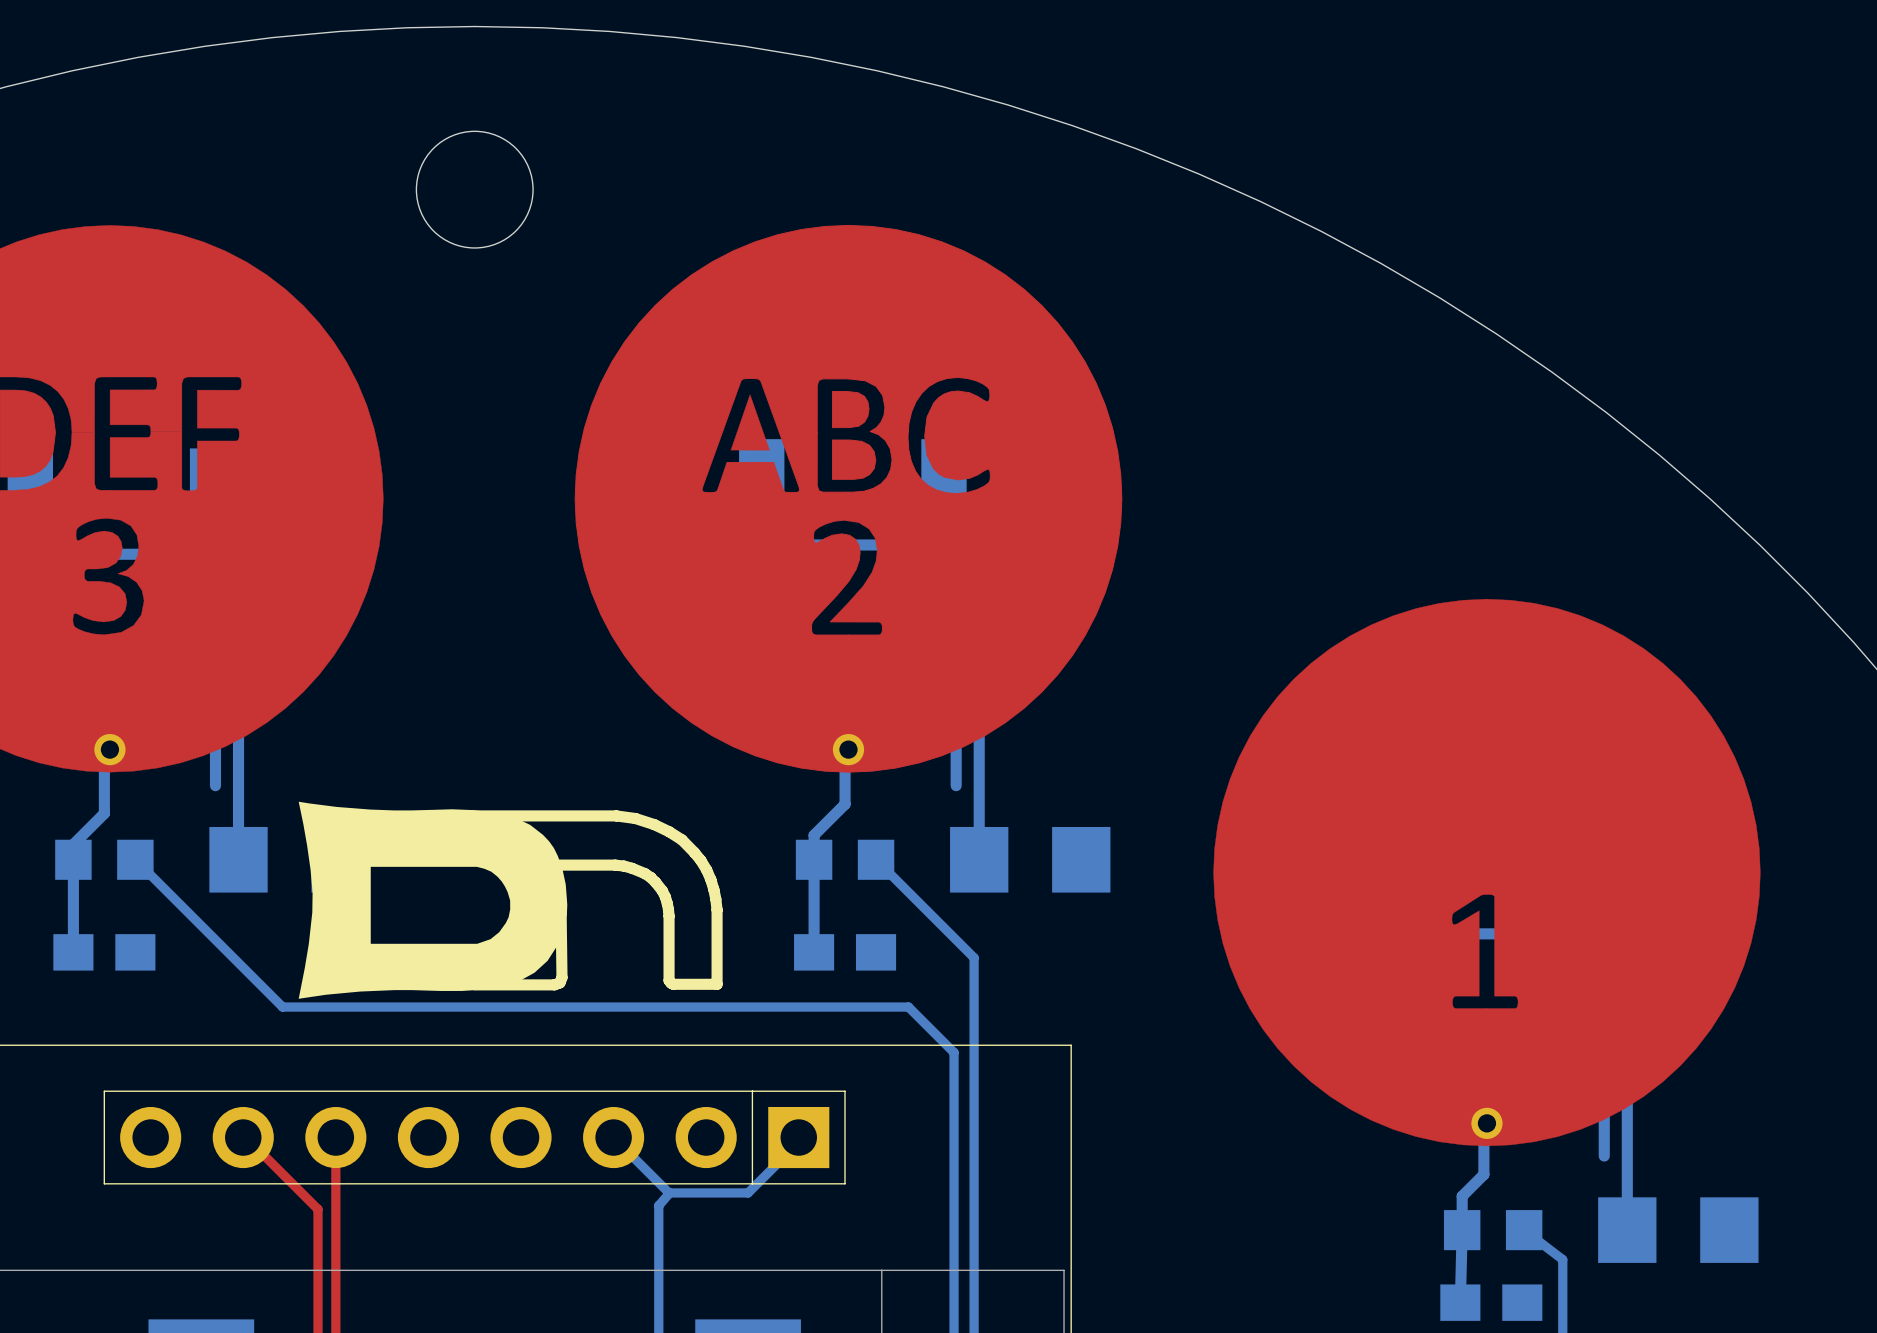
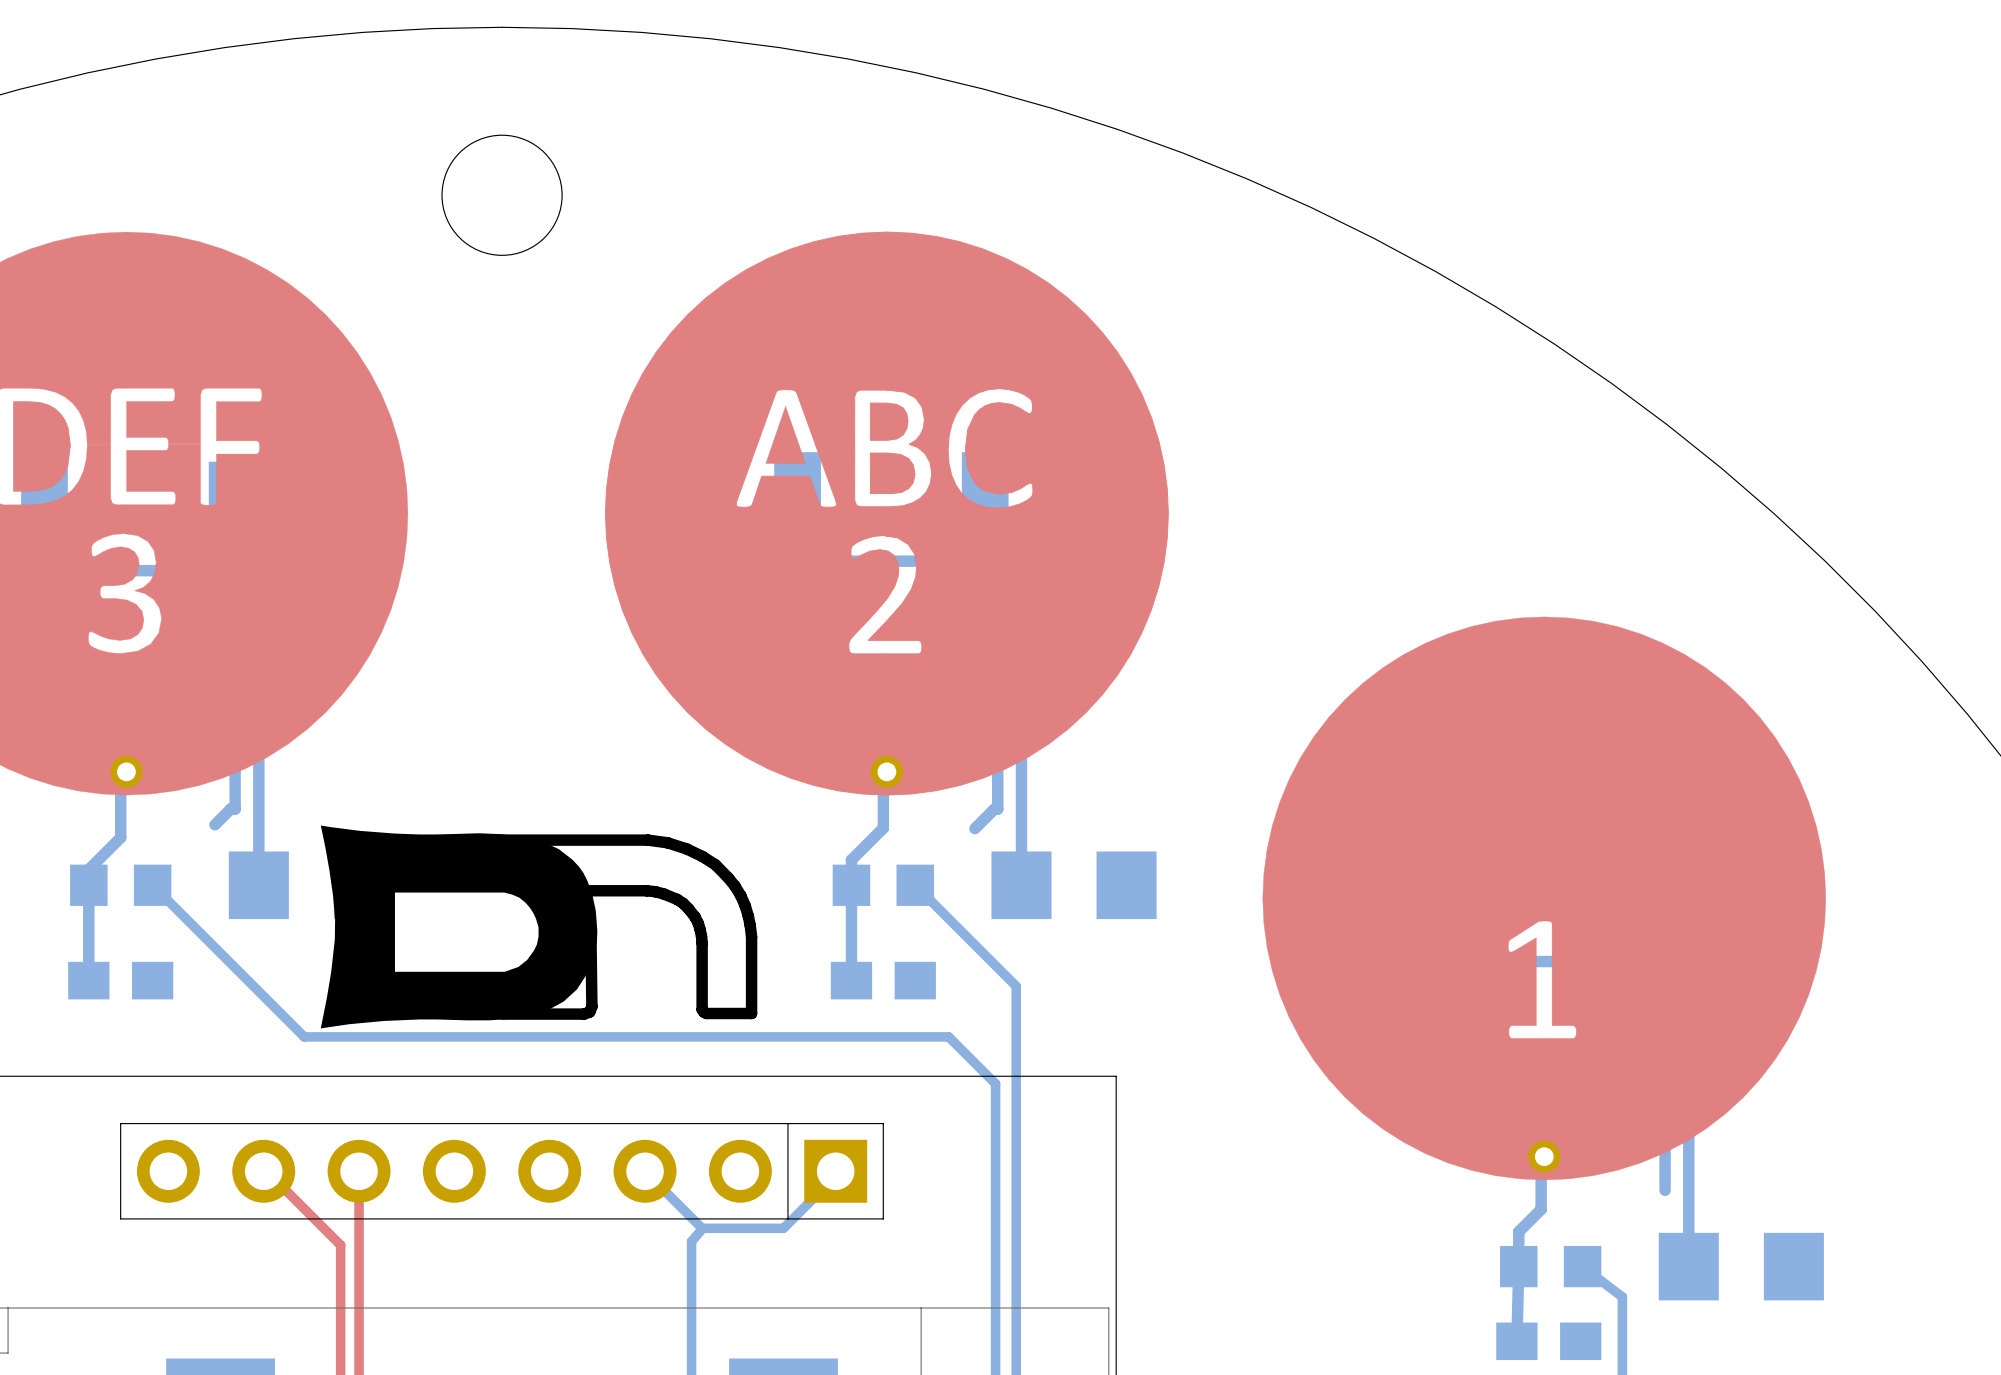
bottom track: none -> (235, 809) (230, 809) (214, 824)
bottom track: none -> (997, 809) (994, 809) (974, 828)

